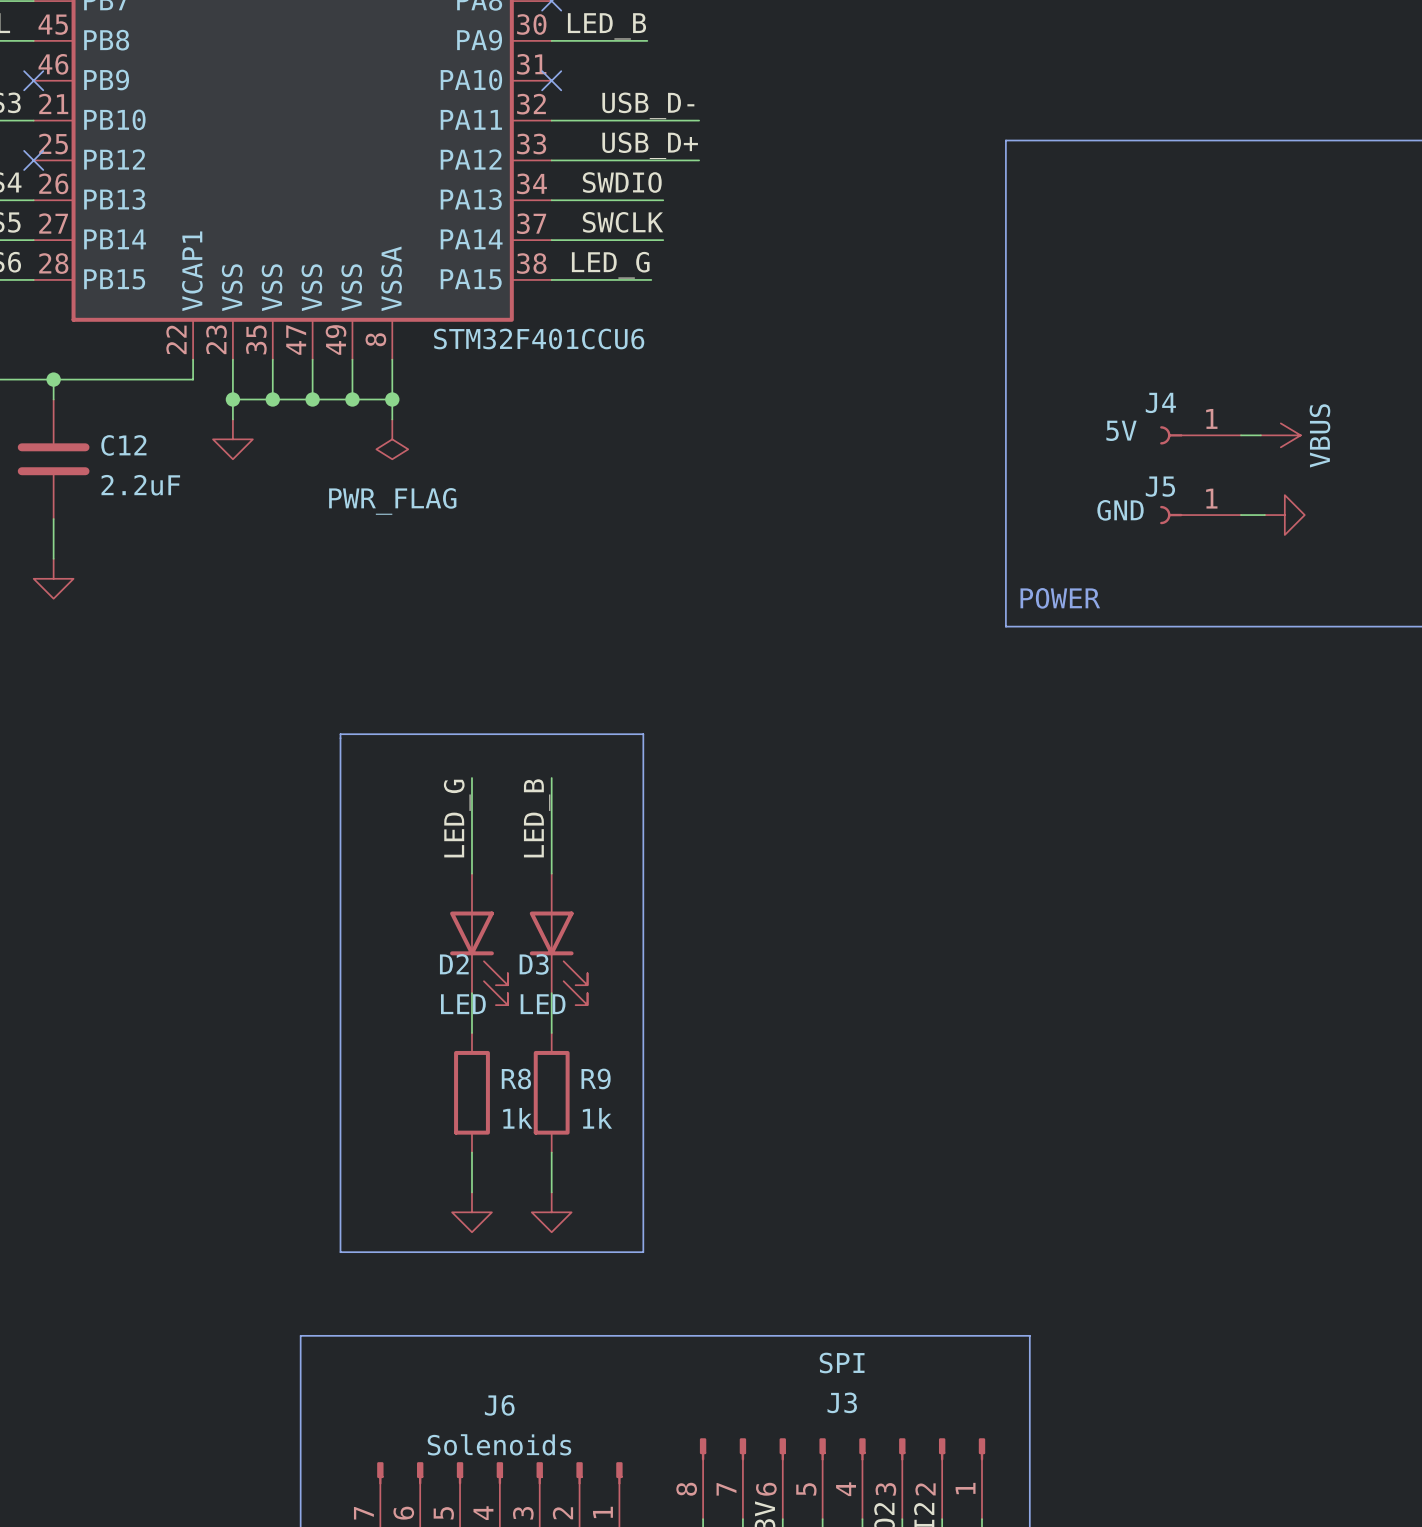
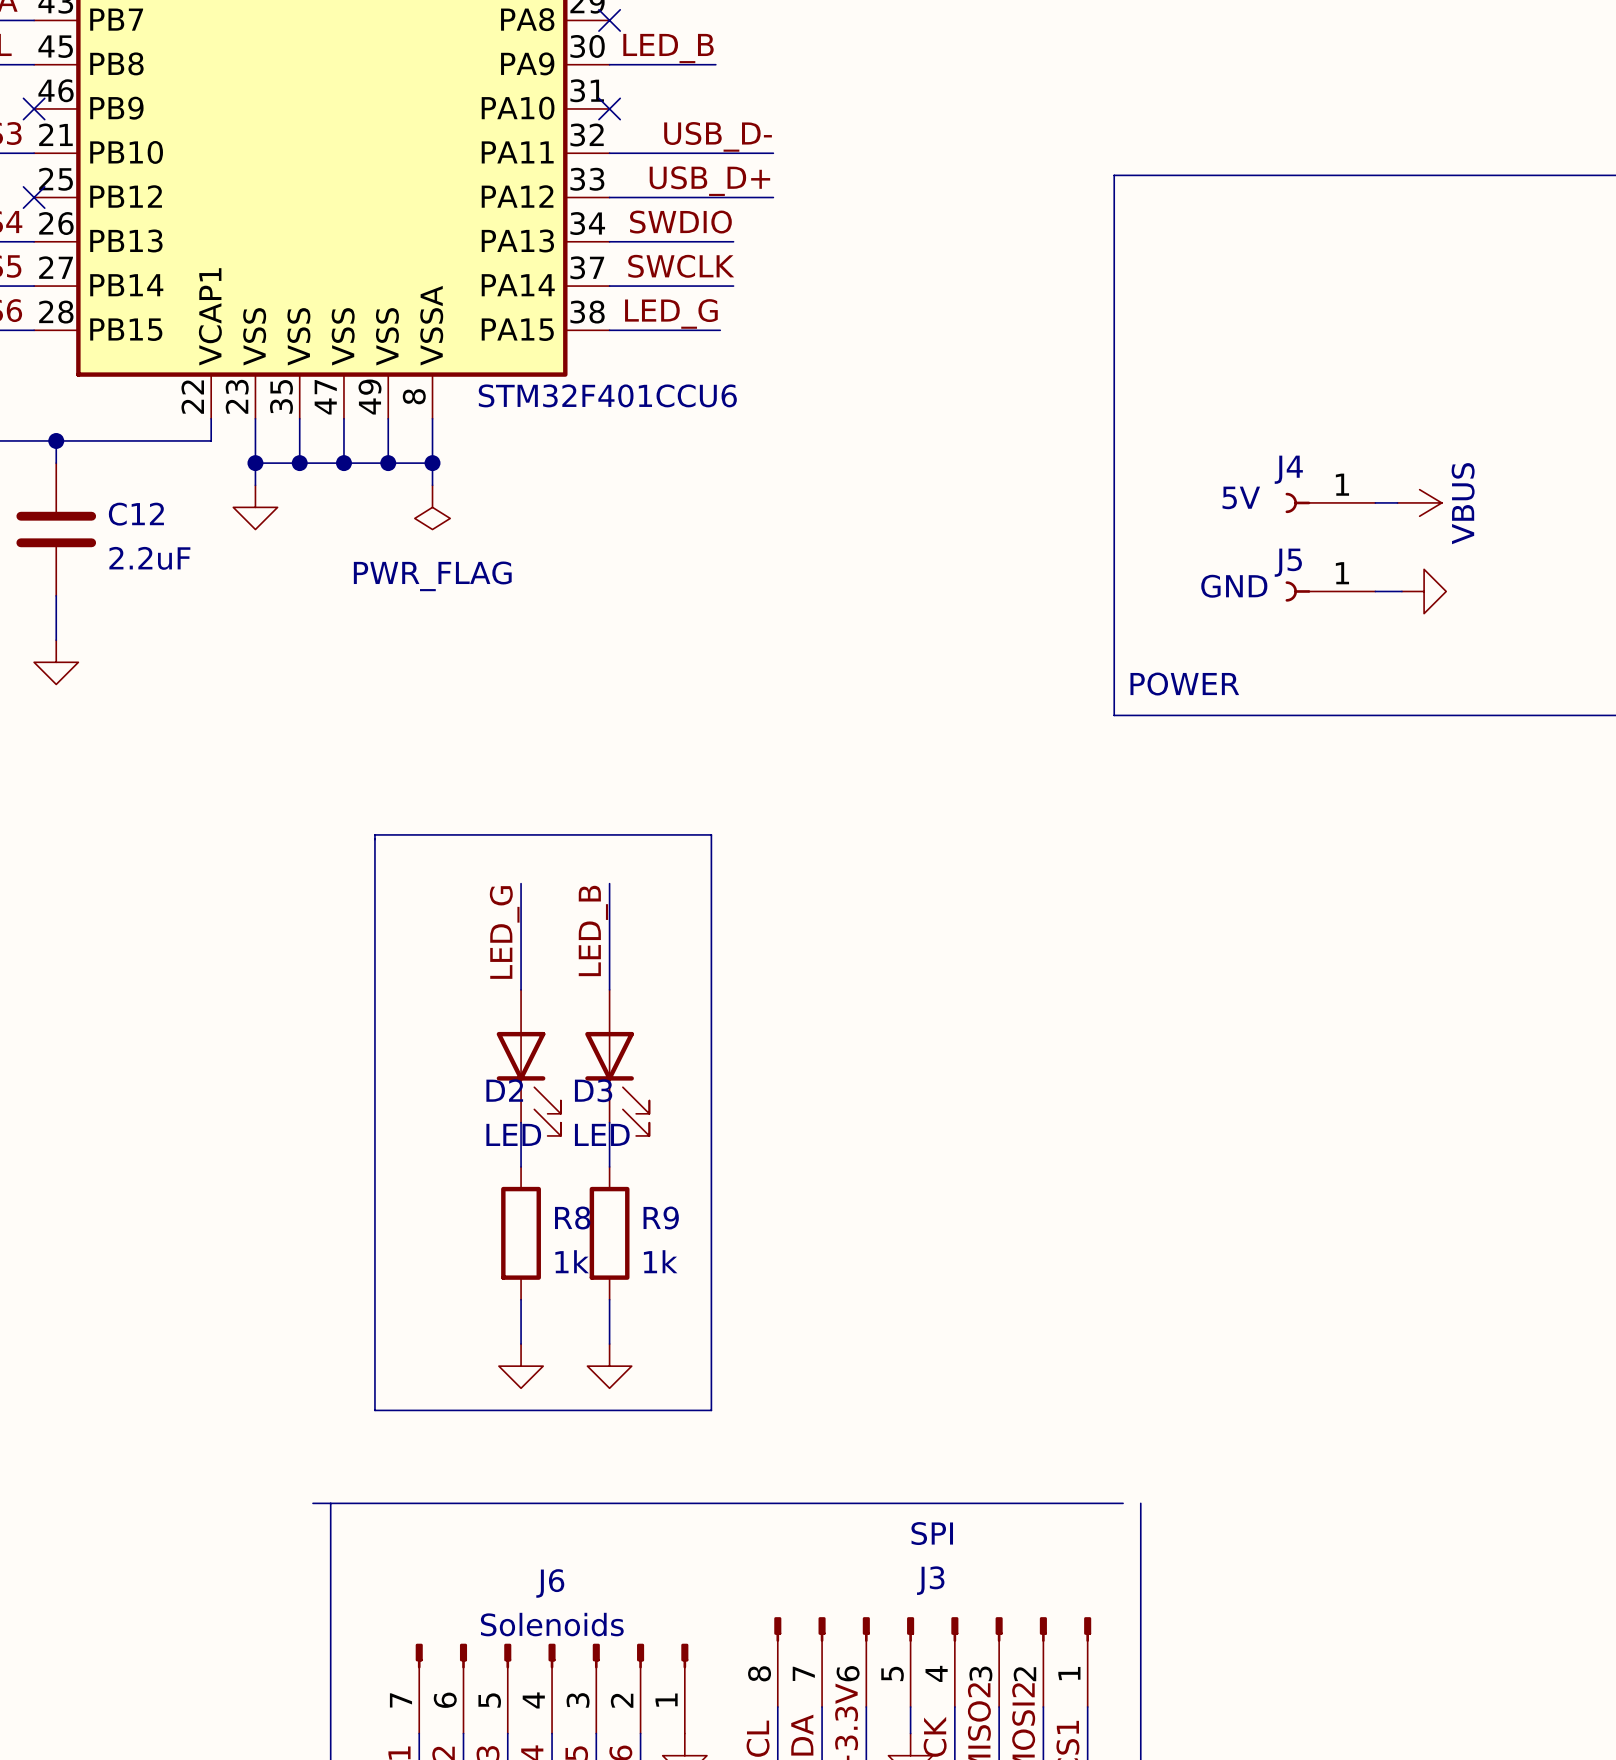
line: none -> (312, 1503) (330, 1503)
line: (1013, 1335) (1029, 1335) -> none

